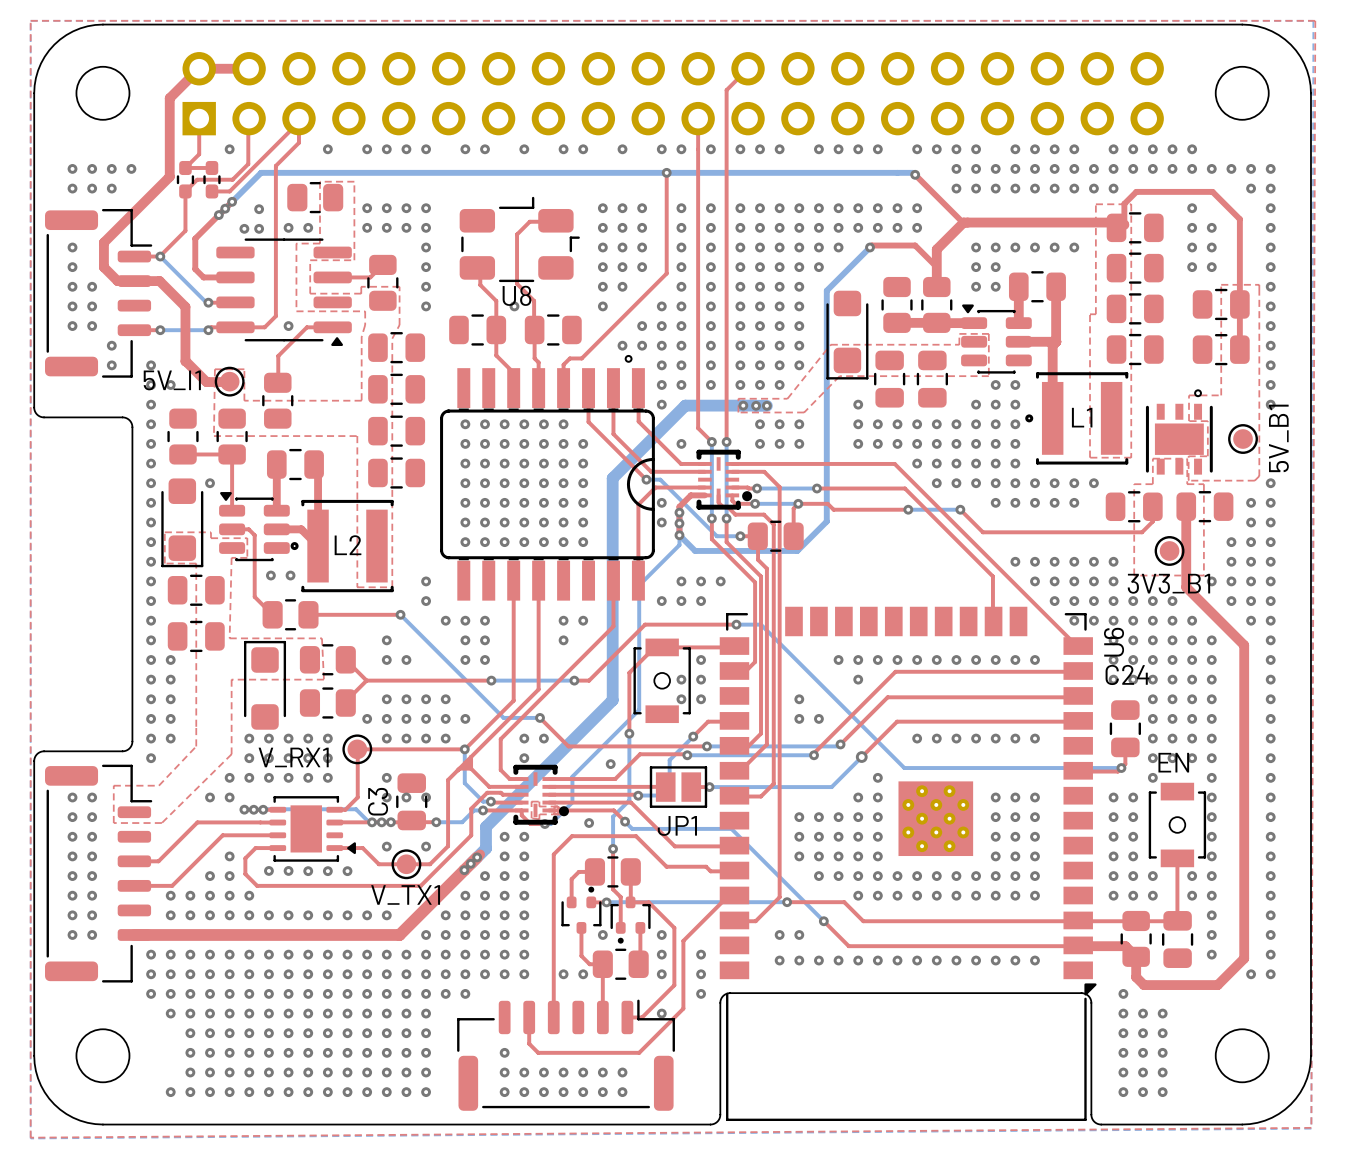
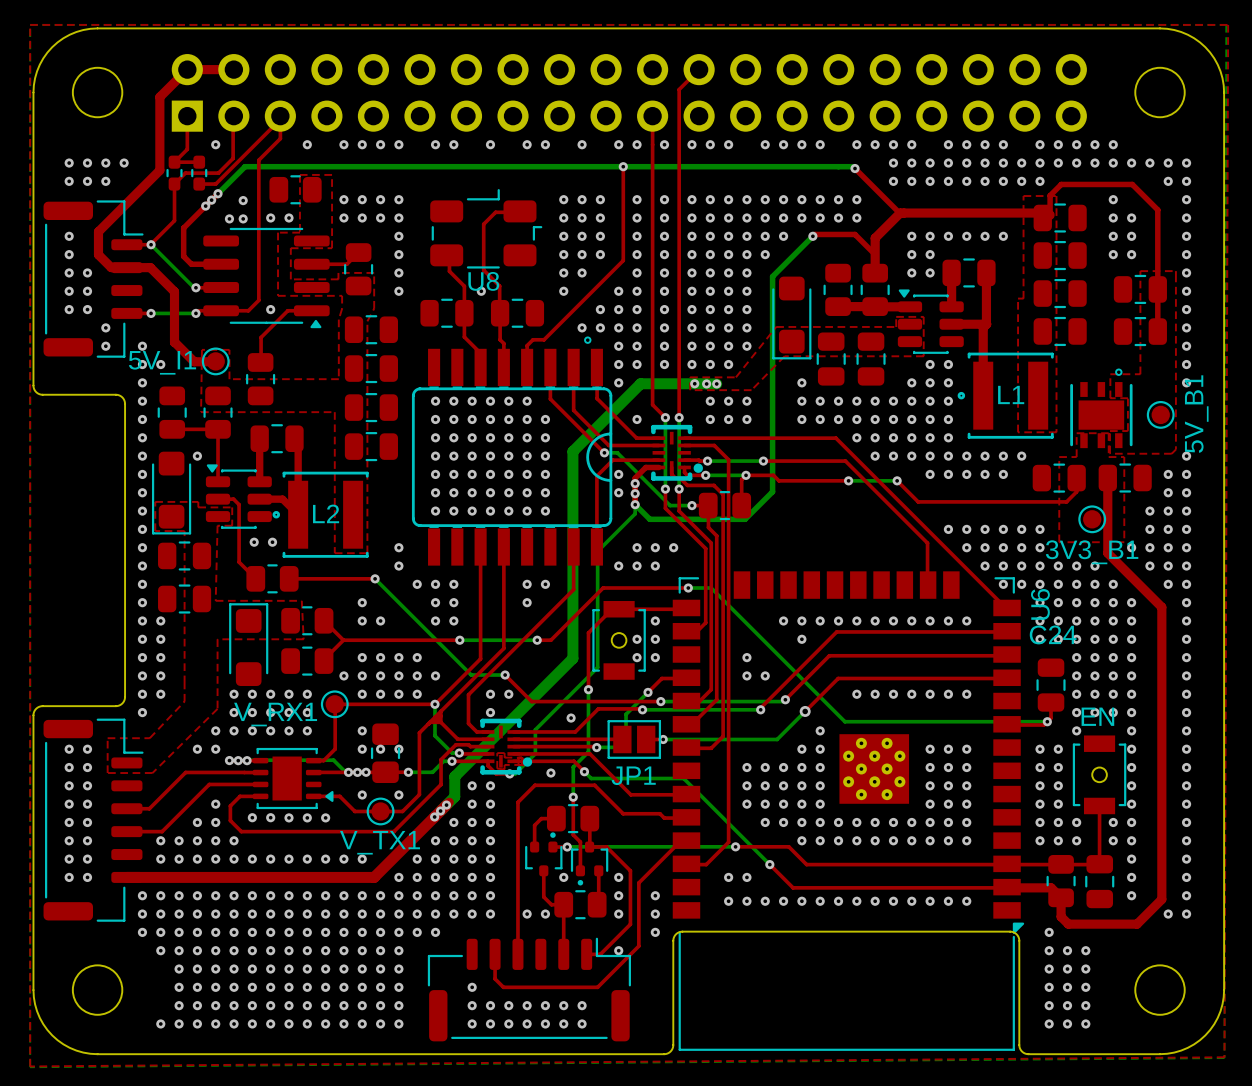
C3: (411, 801) -> none
part: none -> (385, 753)

